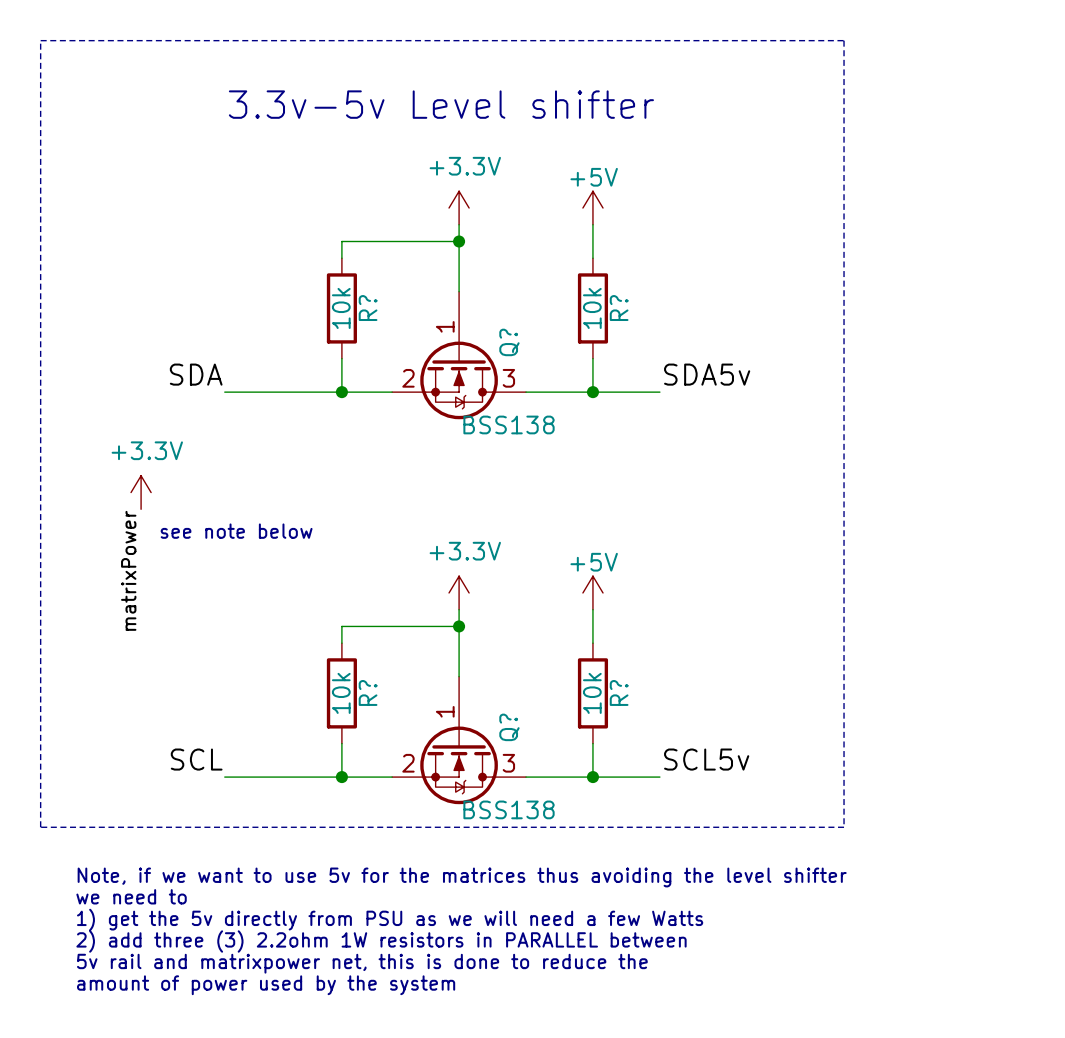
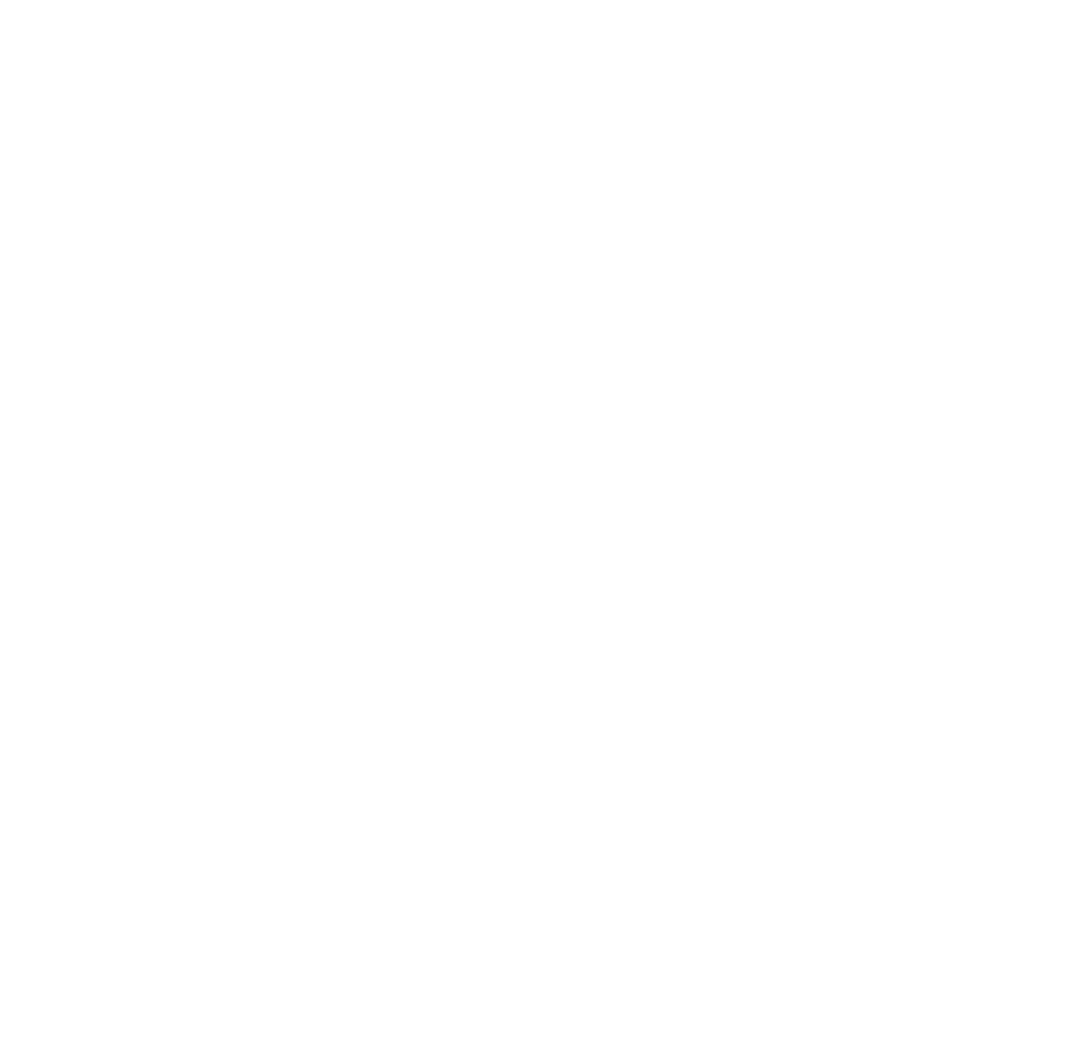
line: (40, 40) (844, 40) (844, 827) (40, 827) (40, 40) -> none
text: 3.3v-5v Level shifter (441, 104) -> none
power symbol: +3.3V (459, 208) -> none
power symbol: +5V (592, 208) -> none
wire: (459, 224) (459, 291) -> none
wire: (592, 224) (592, 258) -> none
wire: (459, 241) (341, 241) (341, 258) -> none
junction: (459, 241) -> none
R?: 10k (341, 308) -> none
R?: 10k (592, 308) -> none
Q?: BSS138 (459, 355) -> none
wire: (341, 358) (341, 392) -> none
wire: (592, 358) (592, 392) -> none
label: SDA (196, 374) -> none
label: SDA5v (707, 374) -> none
wire: (224, 392) (392, 392) -> none
junction: (341, 392) -> none
wire: (526, 392) (659, 392) -> none
junction: (592, 392) -> none
power symbol: +3.3V (141, 492) -> none
text: see note below (236, 531) -> none
label: matrixPower (128, 570) -> none
power symbol: +3.3V (459, 592) -> none
power symbol: +5V (592, 592) -> none
wire: (459, 609) (459, 676) -> none
wire: (592, 609) (592, 643) -> none
wire: (459, 626) (341, 626) (341, 643) -> none
junction: (459, 626) -> none
R?: 10k (341, 693) -> none
R?: 10k (592, 693) -> none
Q?: BSS138 (459, 740) -> none
wire: (341, 743) (341, 777) -> none
wire: (592, 743) (592, 777) -> none
label: SCL (196, 759) -> none
label: SCL5v (706, 759) -> none
wire: (224, 777) (392, 777) -> none
junction: (341, 777) -> none
wire: (526, 777) (659, 777) -> none
junction: (592, 777) -> none
text: Note, if we want to use 5v for the matrices thus avoiding the level shifter (462, 877) -> none
text: we need to (131, 896) -> none
text: 1) get the 5v directly from PSU as we will need a few Watts (390, 919) -> none
text: 2) add three (3) 2.2ohm 1W resistors in PARALLEL between (381, 941) -> none
text: 5v rail and matrixpower net, this is done to reduce the (362, 963) -> none
text: amount of power used by the system (266, 985) -> none

